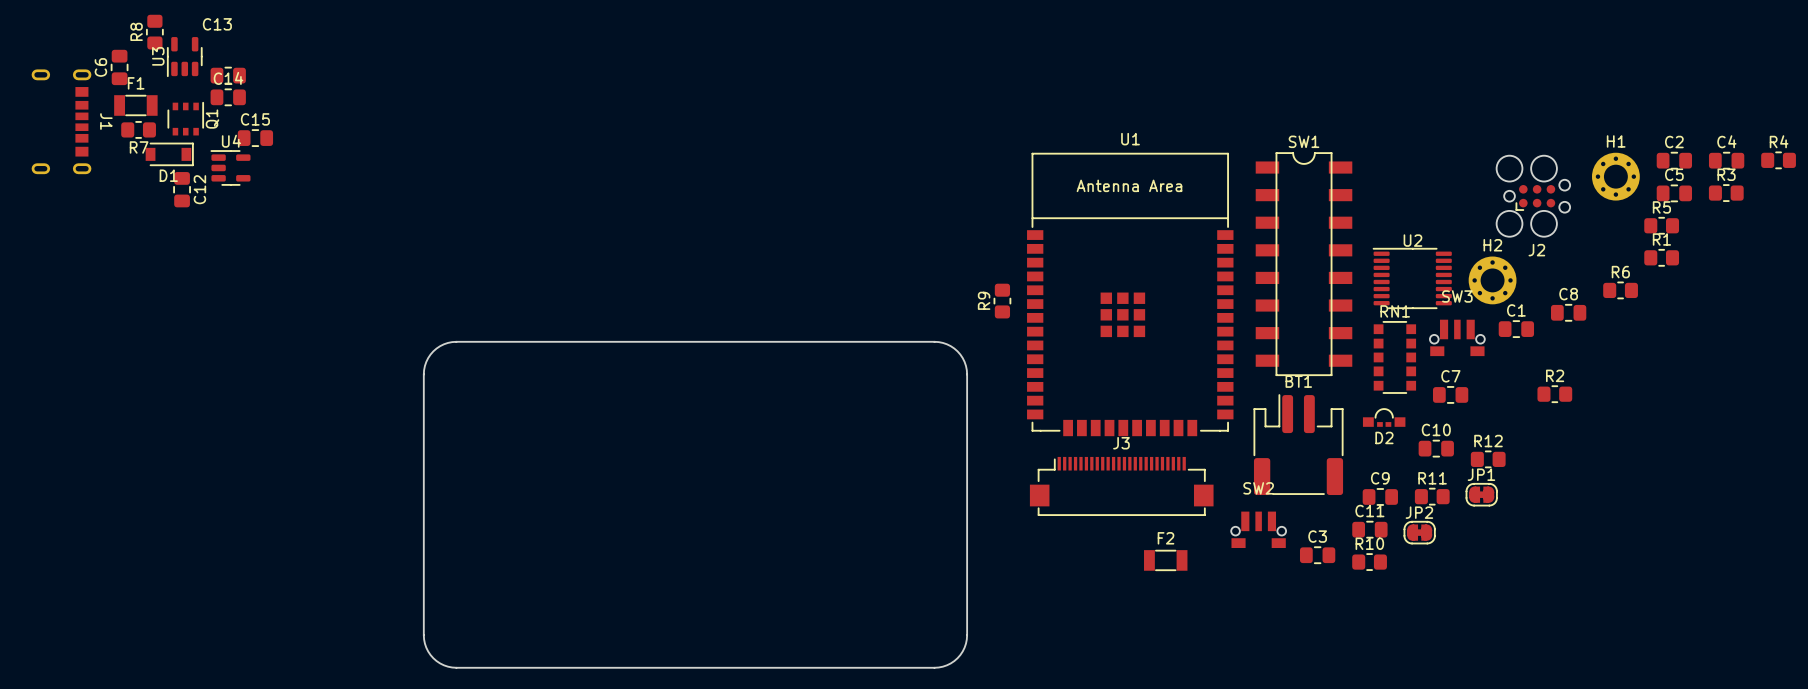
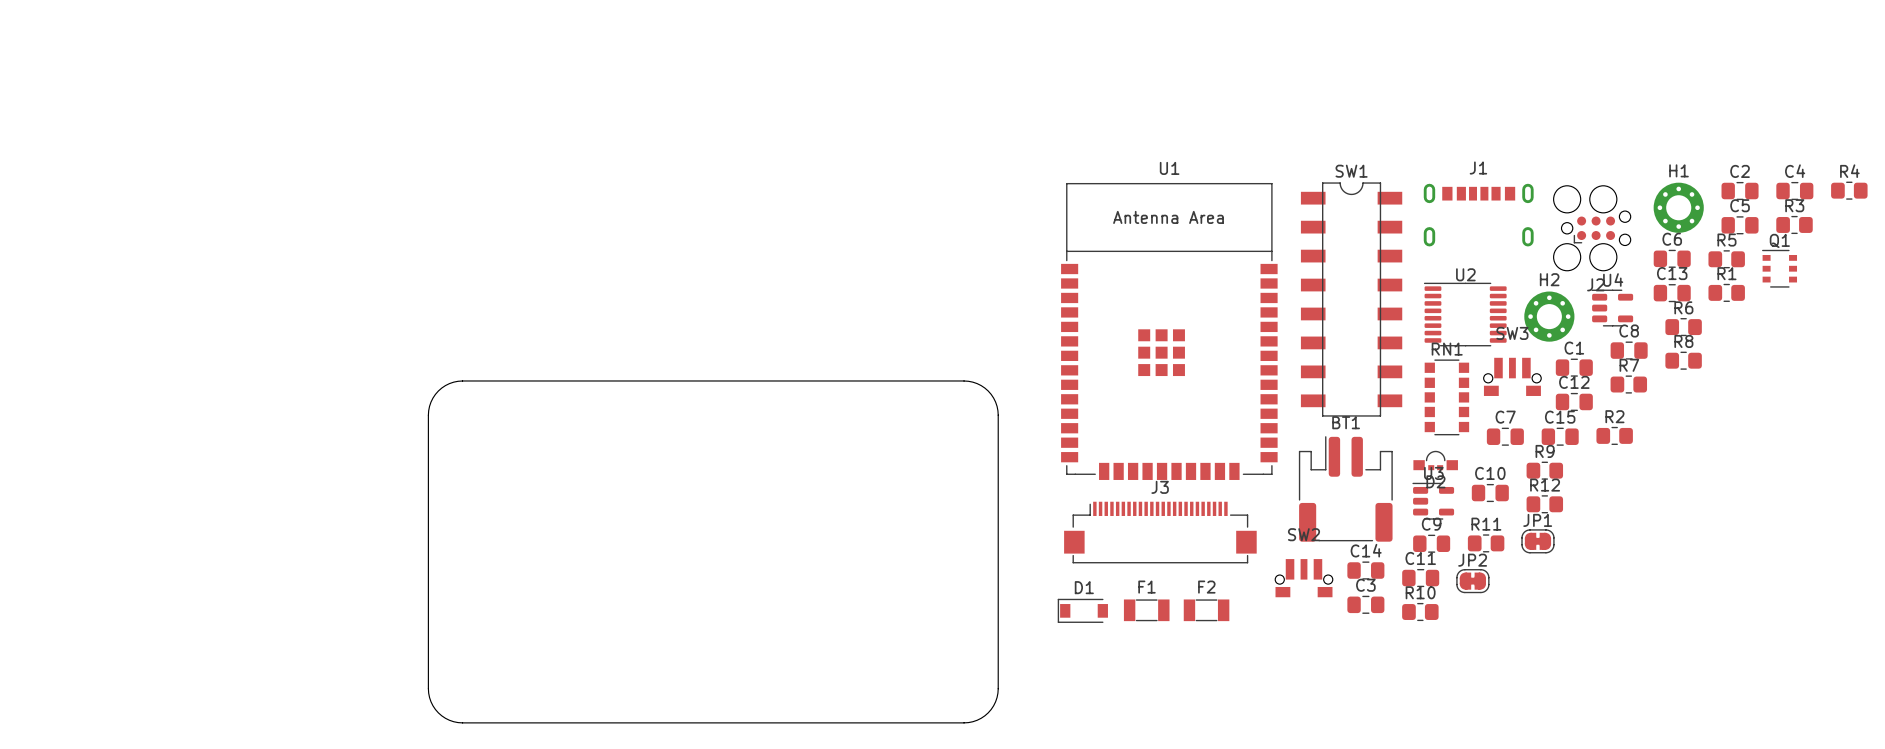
C13 name position: C13 (217, 24) -> C13 (1672, 273)
R8 rotation: 0° (154, 32) -> 90° clockwise (1683, 360)
R8 position: (154, 32) -> (1683, 360)
U3 rotation: 0° (184, 56) -> 90° clockwise (1433, 501)
U3 position: (184, 56) -> (1433, 501)
C6 rotation: 0° (119, 67) -> 90° clockwise (1672, 258)
C6 position: (119, 67) -> (1672, 258)
C13 position: (228, 75) -> (1672, 293)
C14 position: (228, 97) -> (1365, 570)
F1 position: (135, 105) -> (1146, 610)
Q1 rotation: 0° (185, 118) -> 90° counterclockwise (1779, 268)
Q1 position: (185, 118) -> (1779, 268)
J1 rotation: 0° (61, 121) -> 90° counterclockwise (1478, 215)
J1 position: (61, 121) -> (1478, 215)
R7 position: (138, 129) -> (1628, 384)
C15 position: (255, 138) -> (1560, 436)
R7 name position: R7 (139, 147) -> R7 (1629, 365)
D1 rotation: 0° (169, 154) -> 180° (1082, 610)
D1 position: (169, 154) -> (1082, 610)
U4 position: (230, 167) -> (1612, 308)
C12 rotation: 0° (182, 189) -> 90° clockwise (1574, 401)
C12 position: (182, 189) -> (1574, 401)
C12 name position: C12 (199, 189) -> C12 (1574, 382)
R9 rotation: 0° (1002, 301) -> 90° clockwise (1544, 470)
R9 position: (1002, 301) -> (1544, 470)

